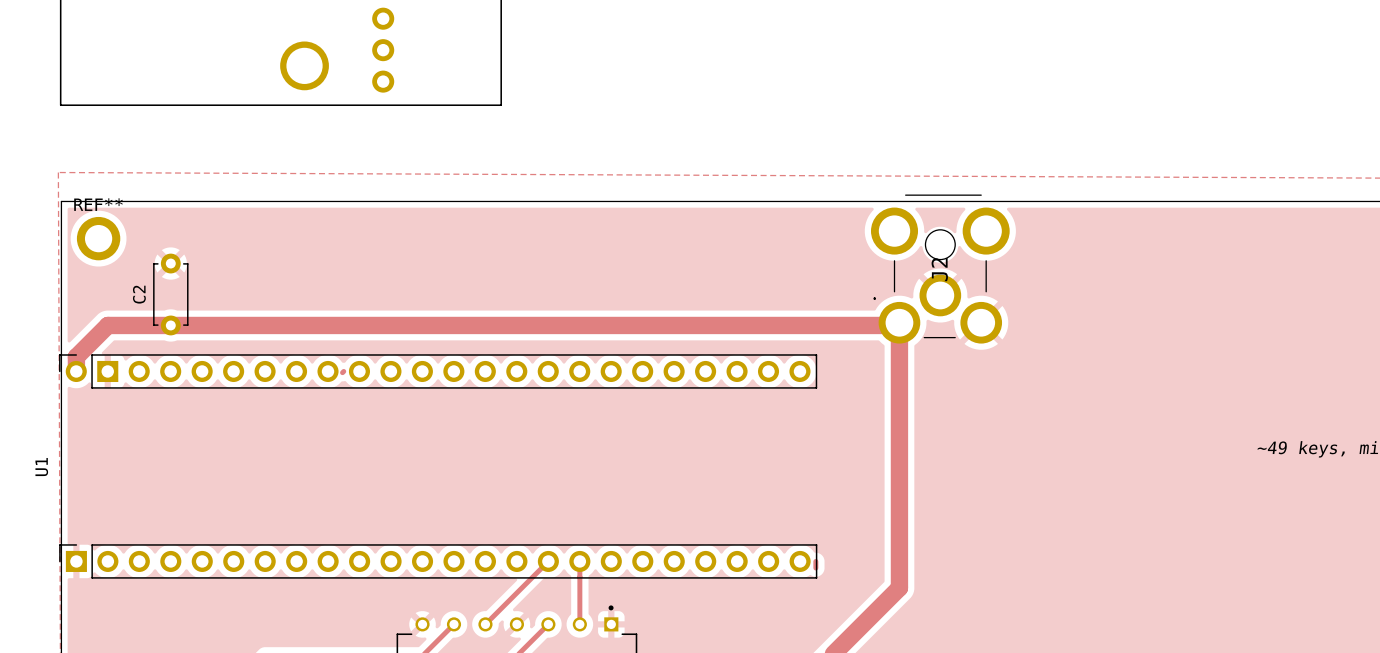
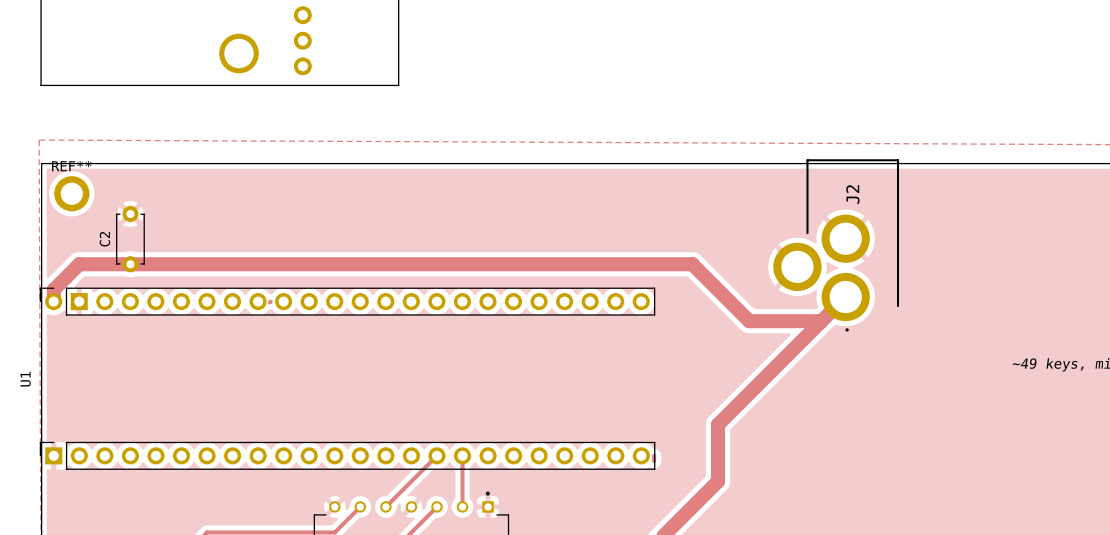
J2 footprint: [871, 194, 1010, 344] -> [773, 159, 900, 332]
J2 name position: J2 (939, 269) -> J2 (852, 194)
track: (863, 325) (896, 325) (899, 322) (899, 587) (894, 592) -> (845, 297) (717, 424) (717, 481)
track: none -> (692, 264) (749, 321) (821, 321)

